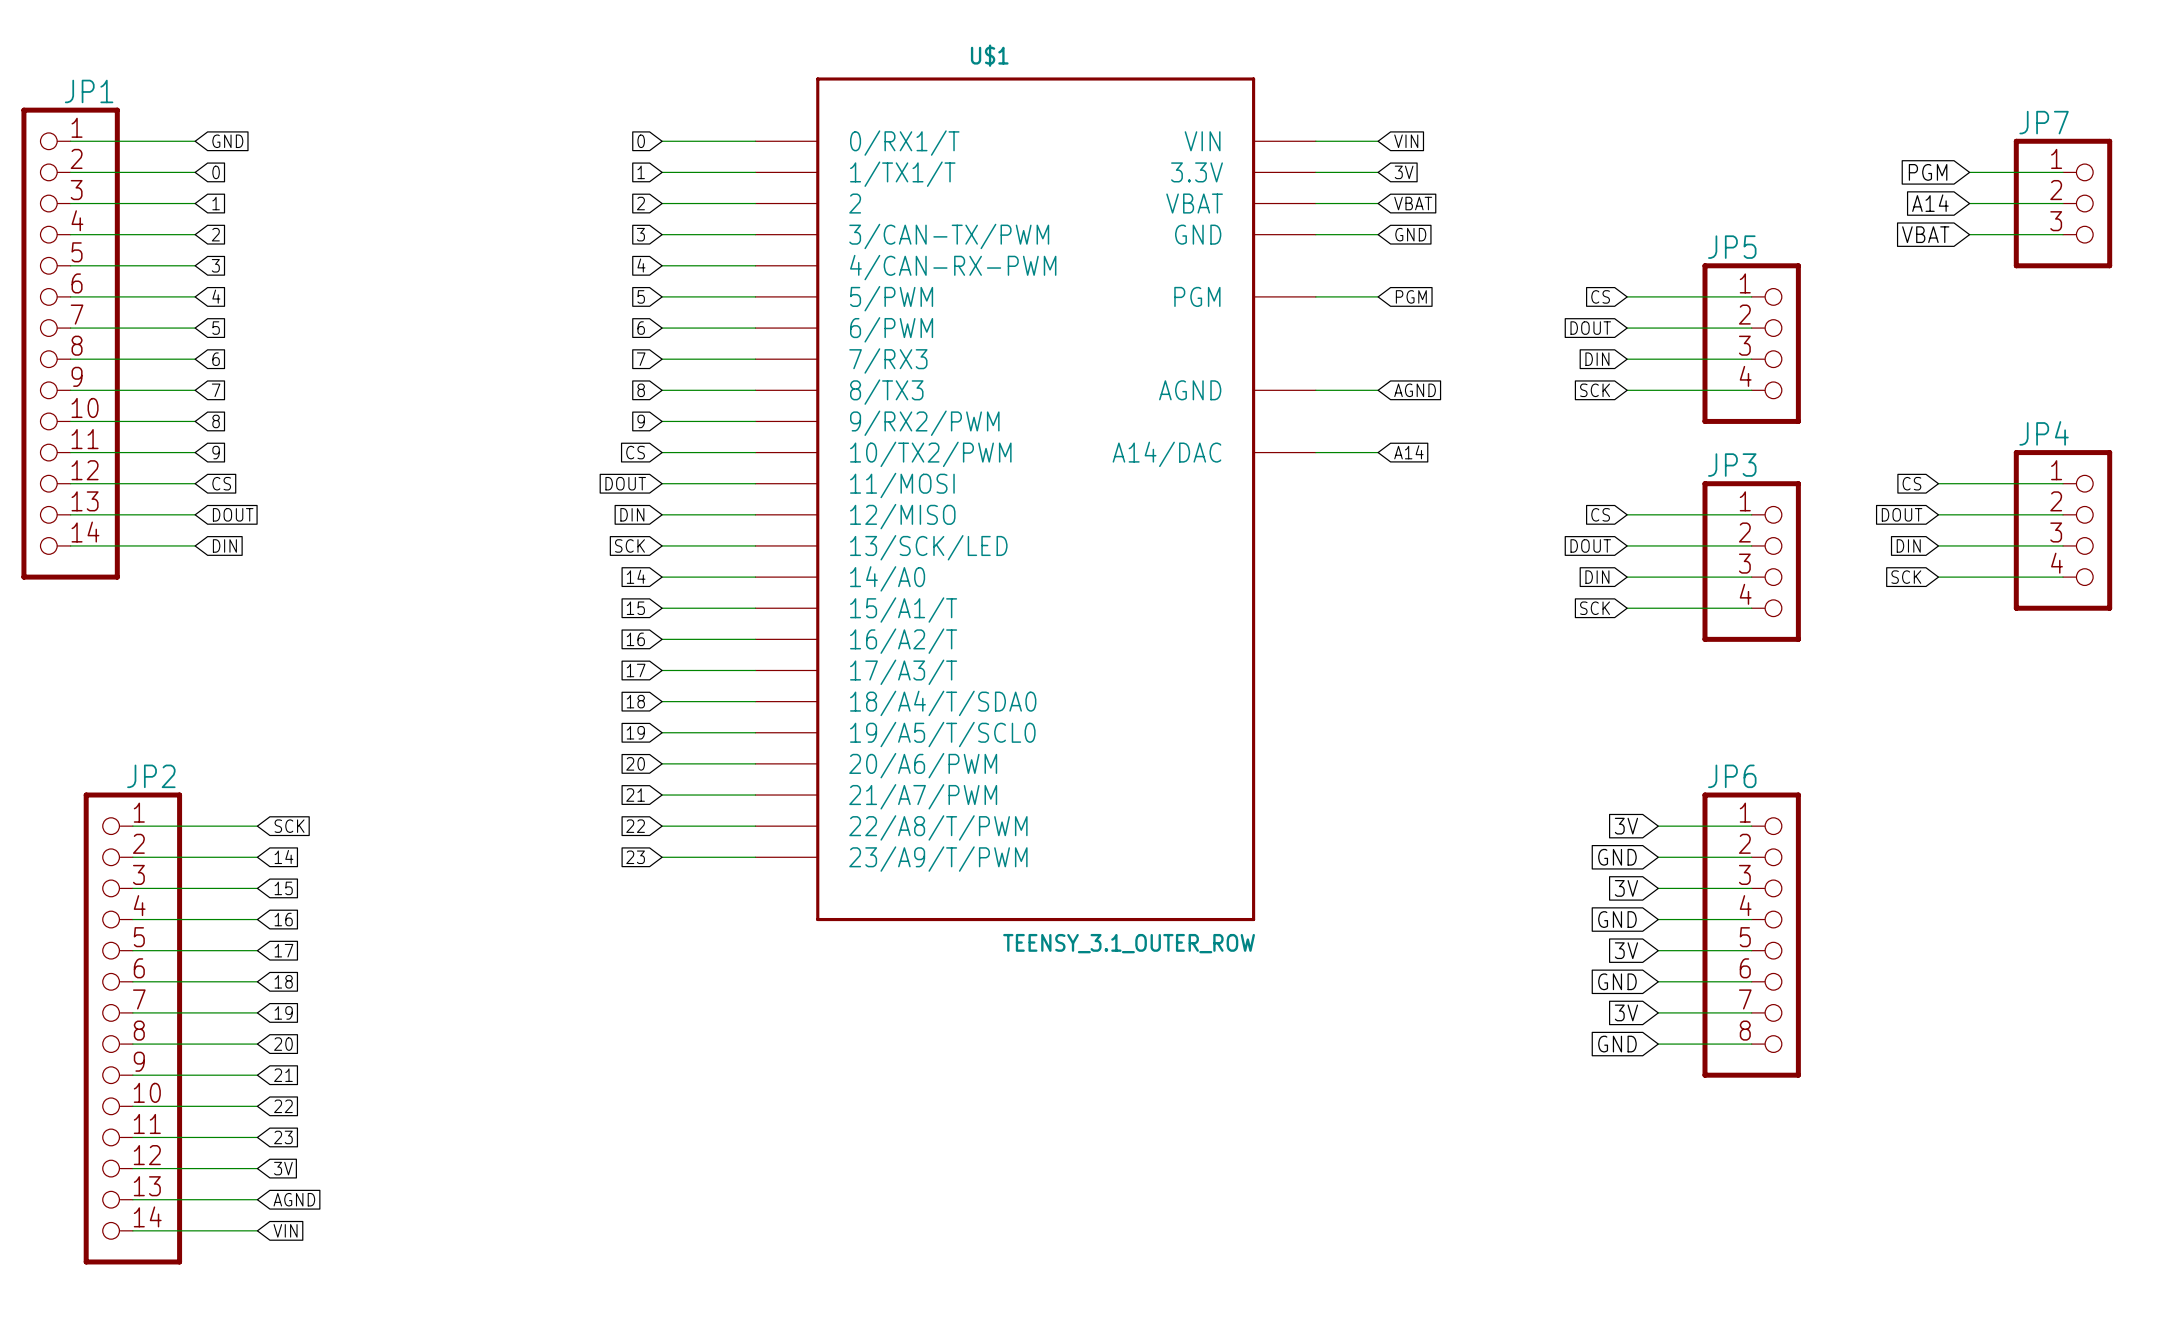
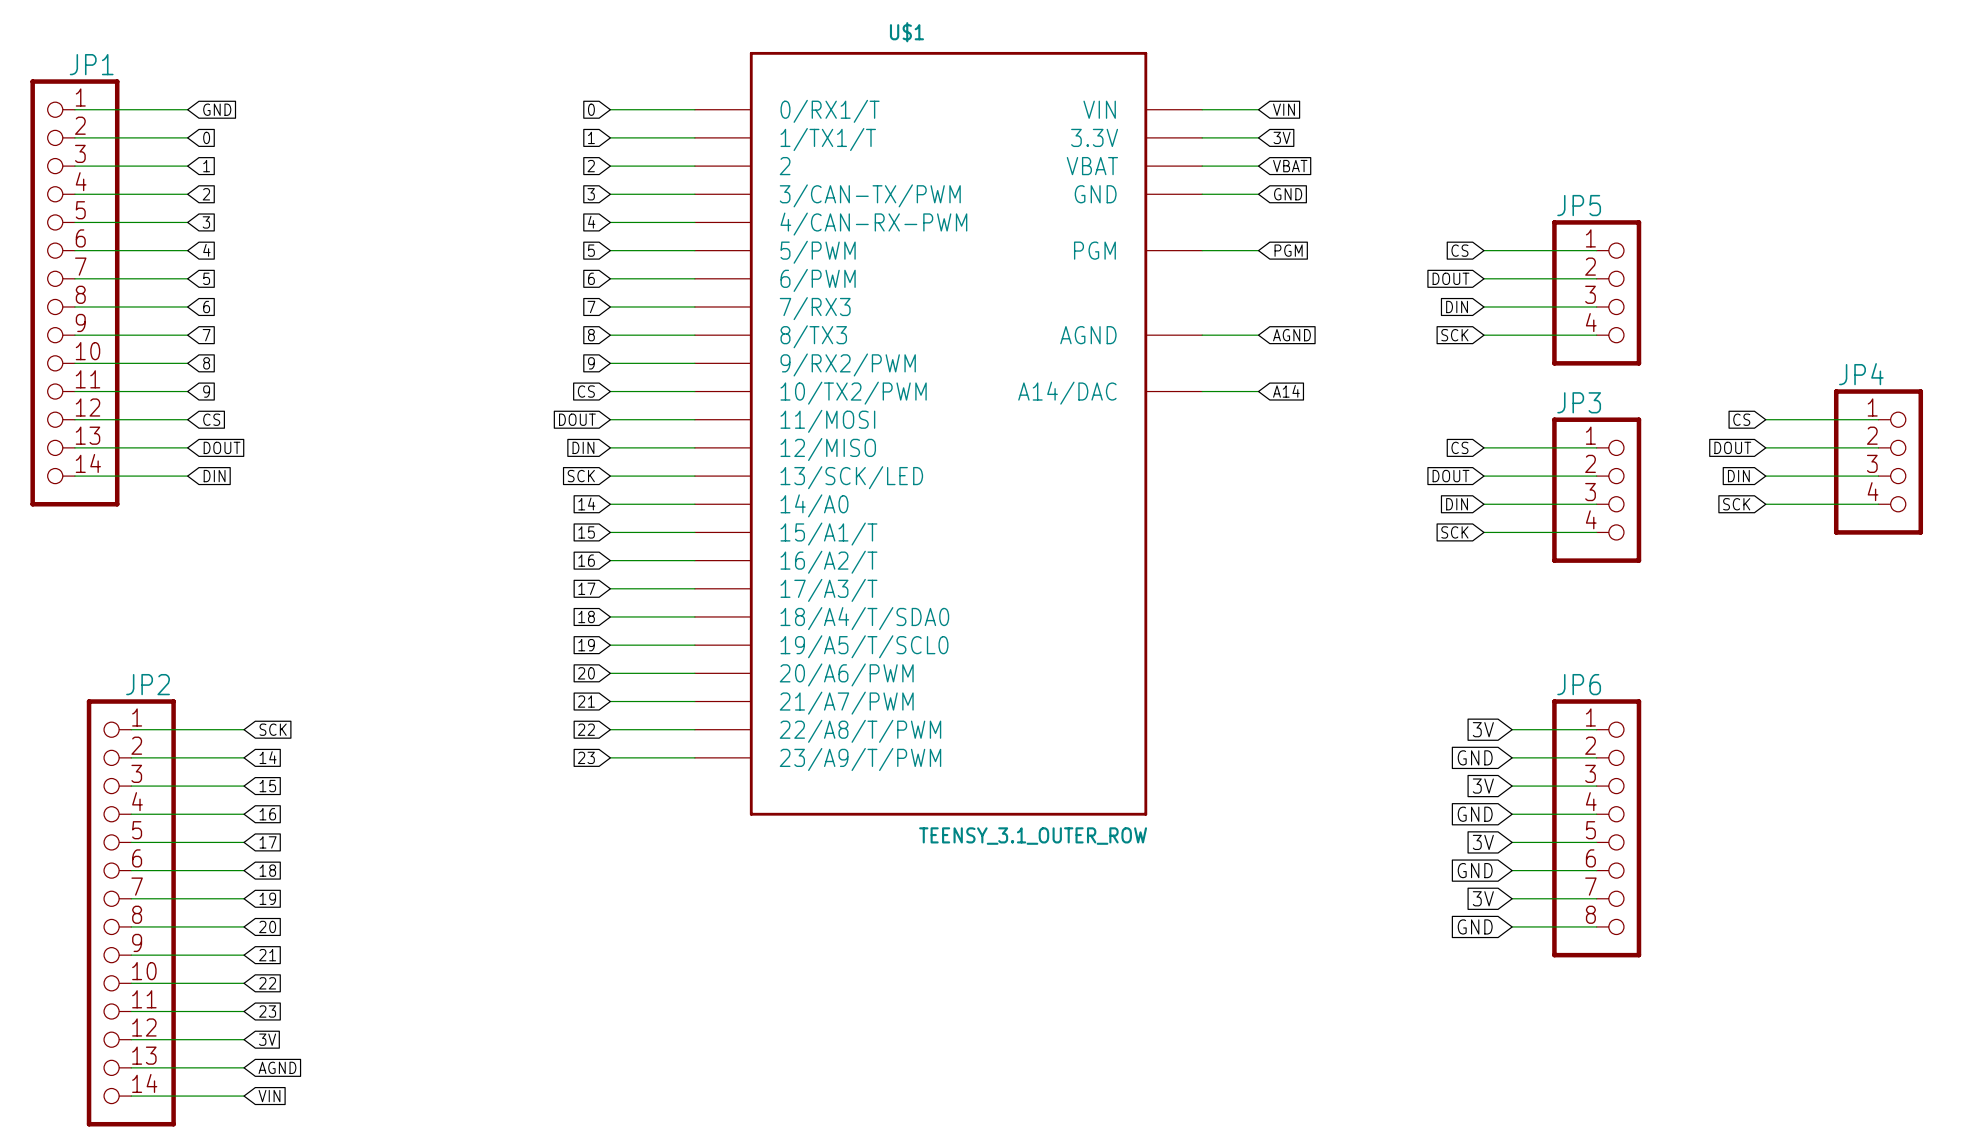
global label: PGM (1928, 172) -> none
wire: (1969, 172) (2062, 172) -> none
global label: A14 (1930, 203) -> none
wire: (1969, 203) (2062, 203) -> none
JP7: (2062, 203) -> none
global label: VBAT (1925, 234) -> none
wire: (1969, 234) (2062, 234) -> none

